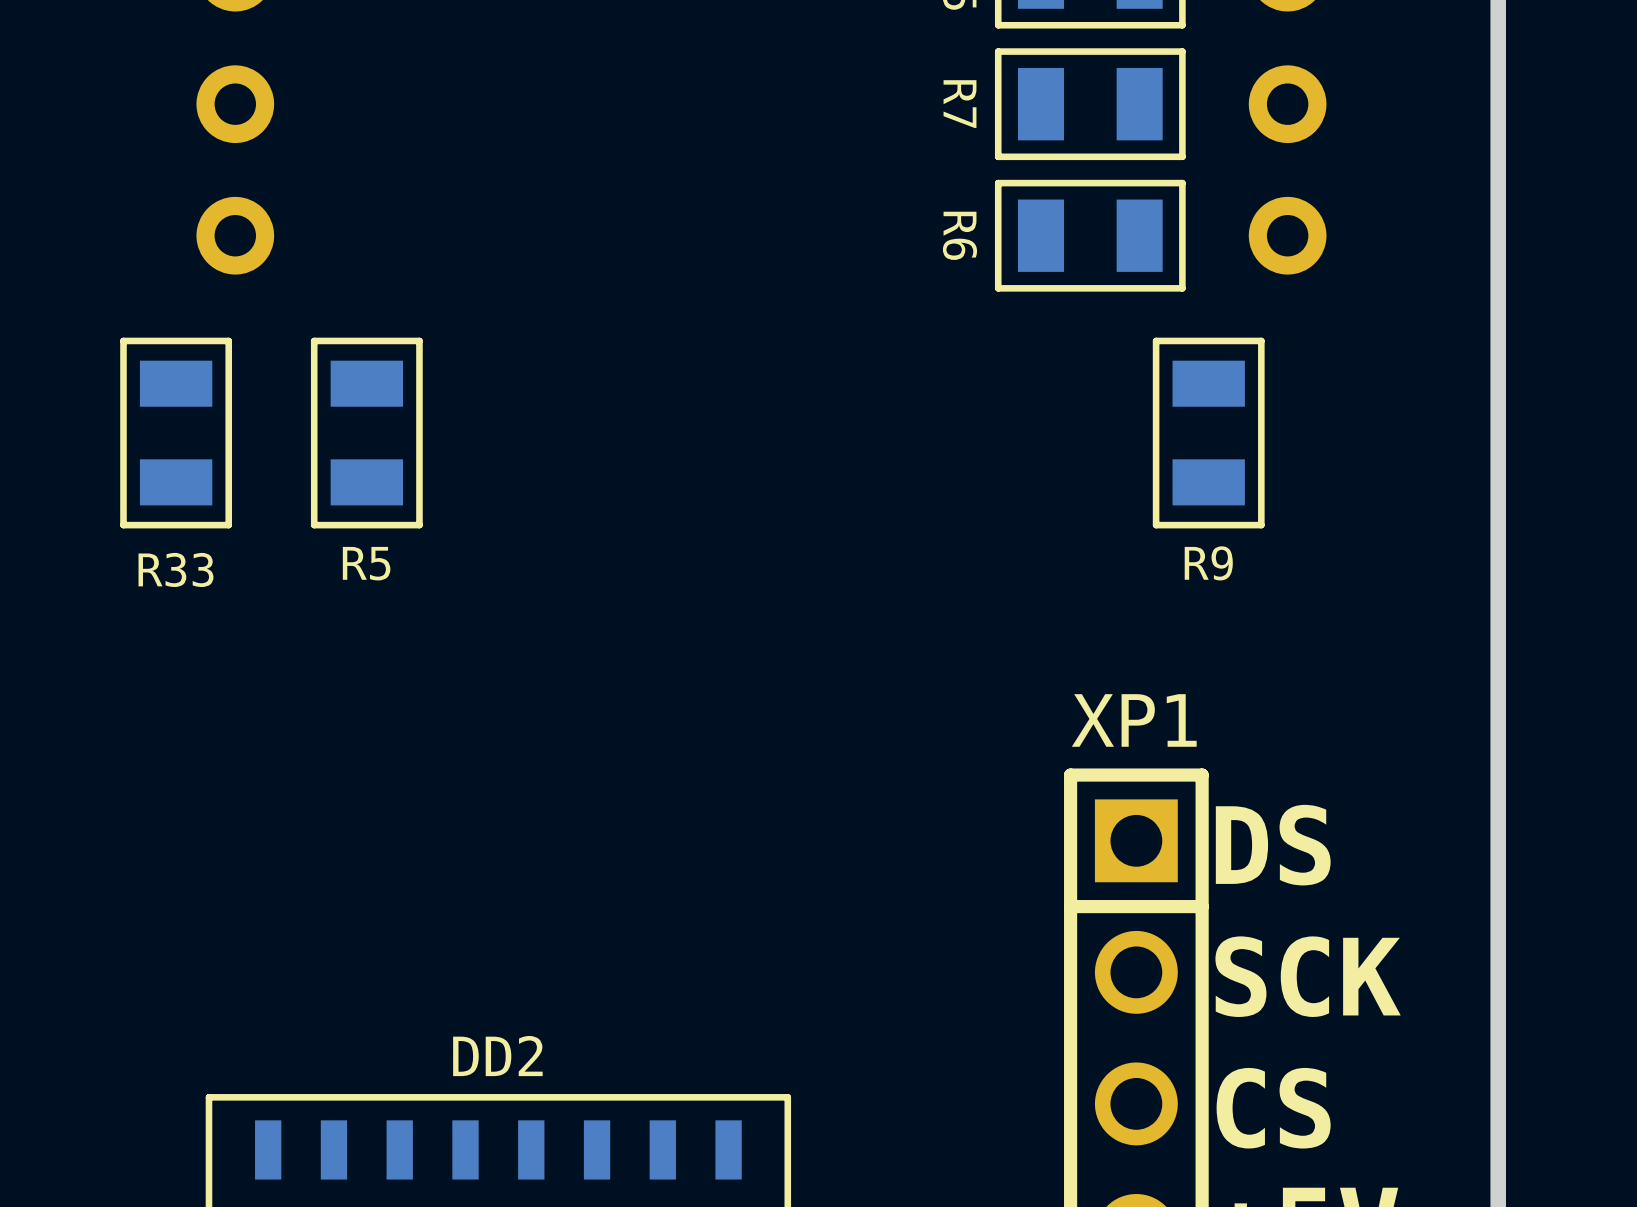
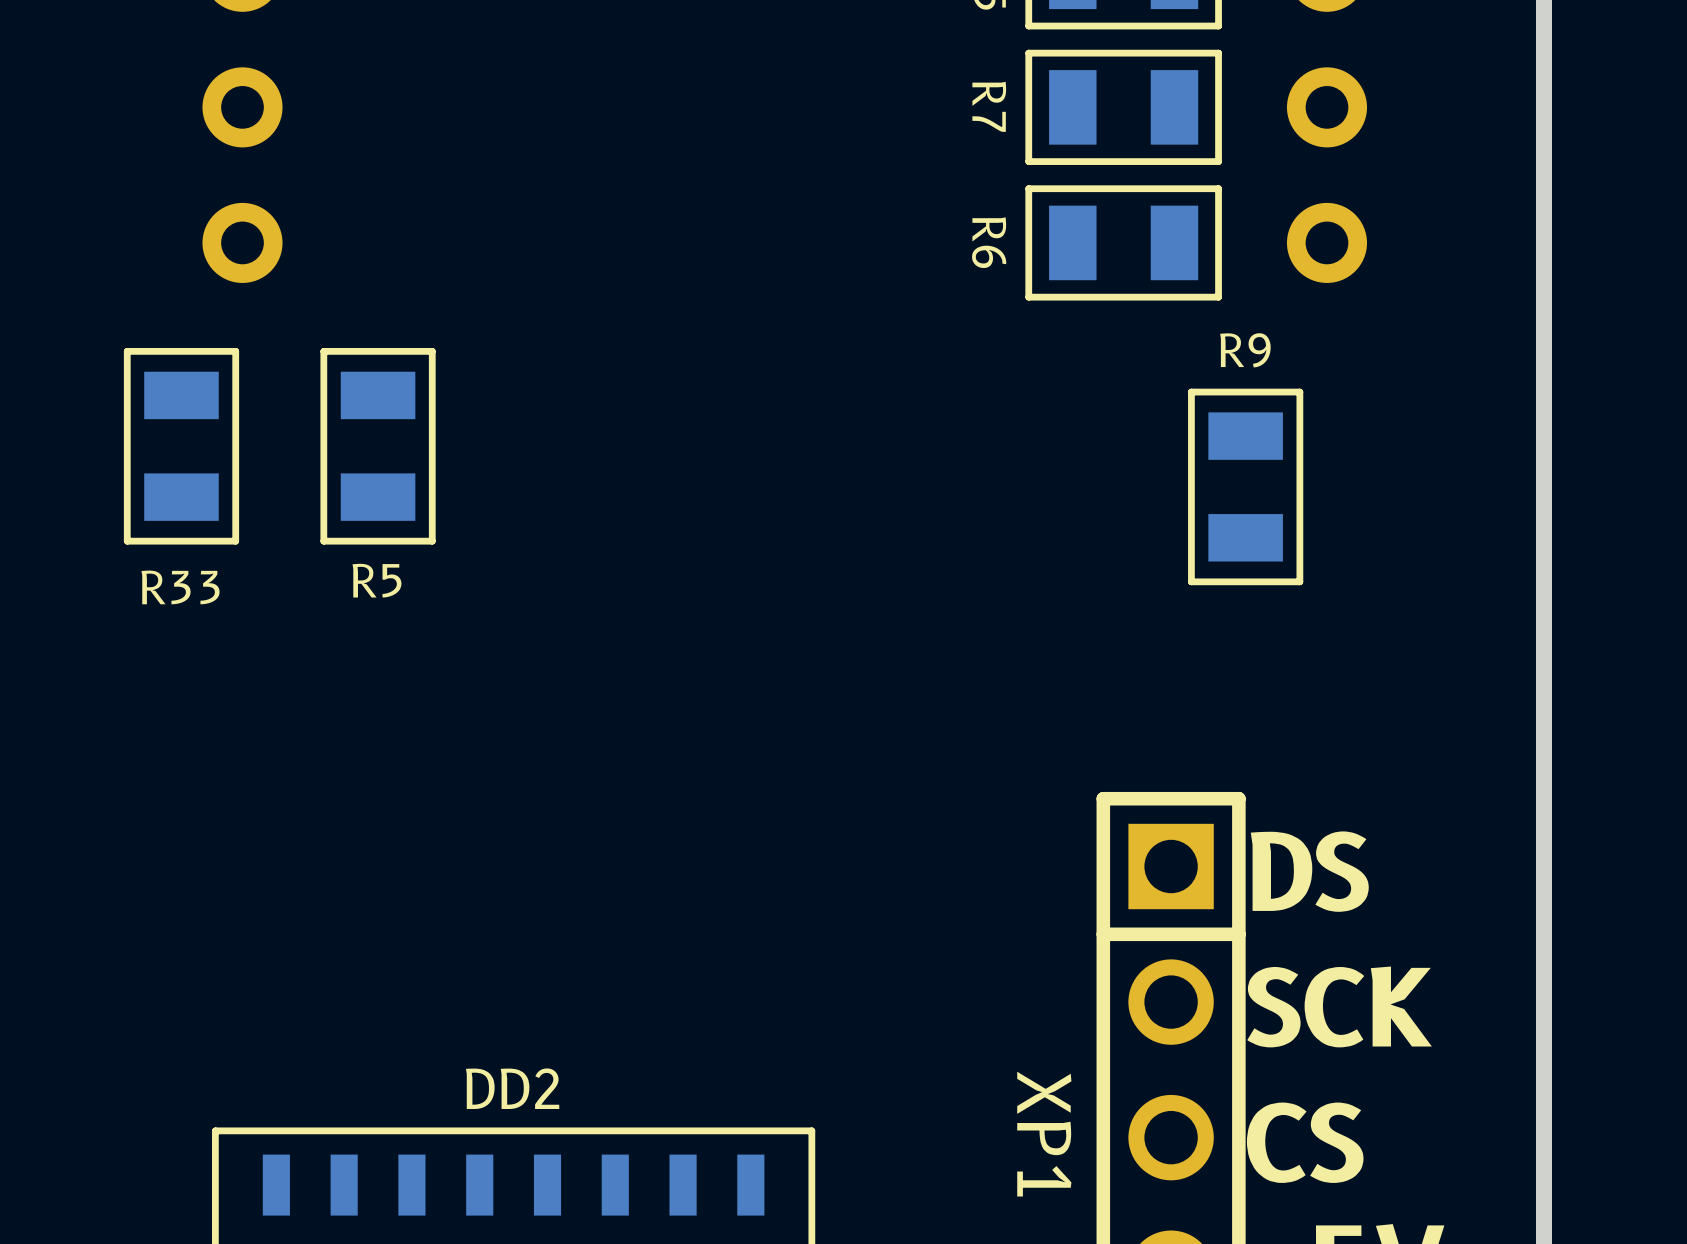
R9 position: (1208, 433) -> (1245, 486)
R9 name position: R9 (1208, 563) -> R9 (1245, 350)
XP1 name rotation: 0° (1134, 720) -> 90° clockwise (1044, 1134)
XP1 name position: XP1 (1134, 720) -> XP1 (1044, 1134)

